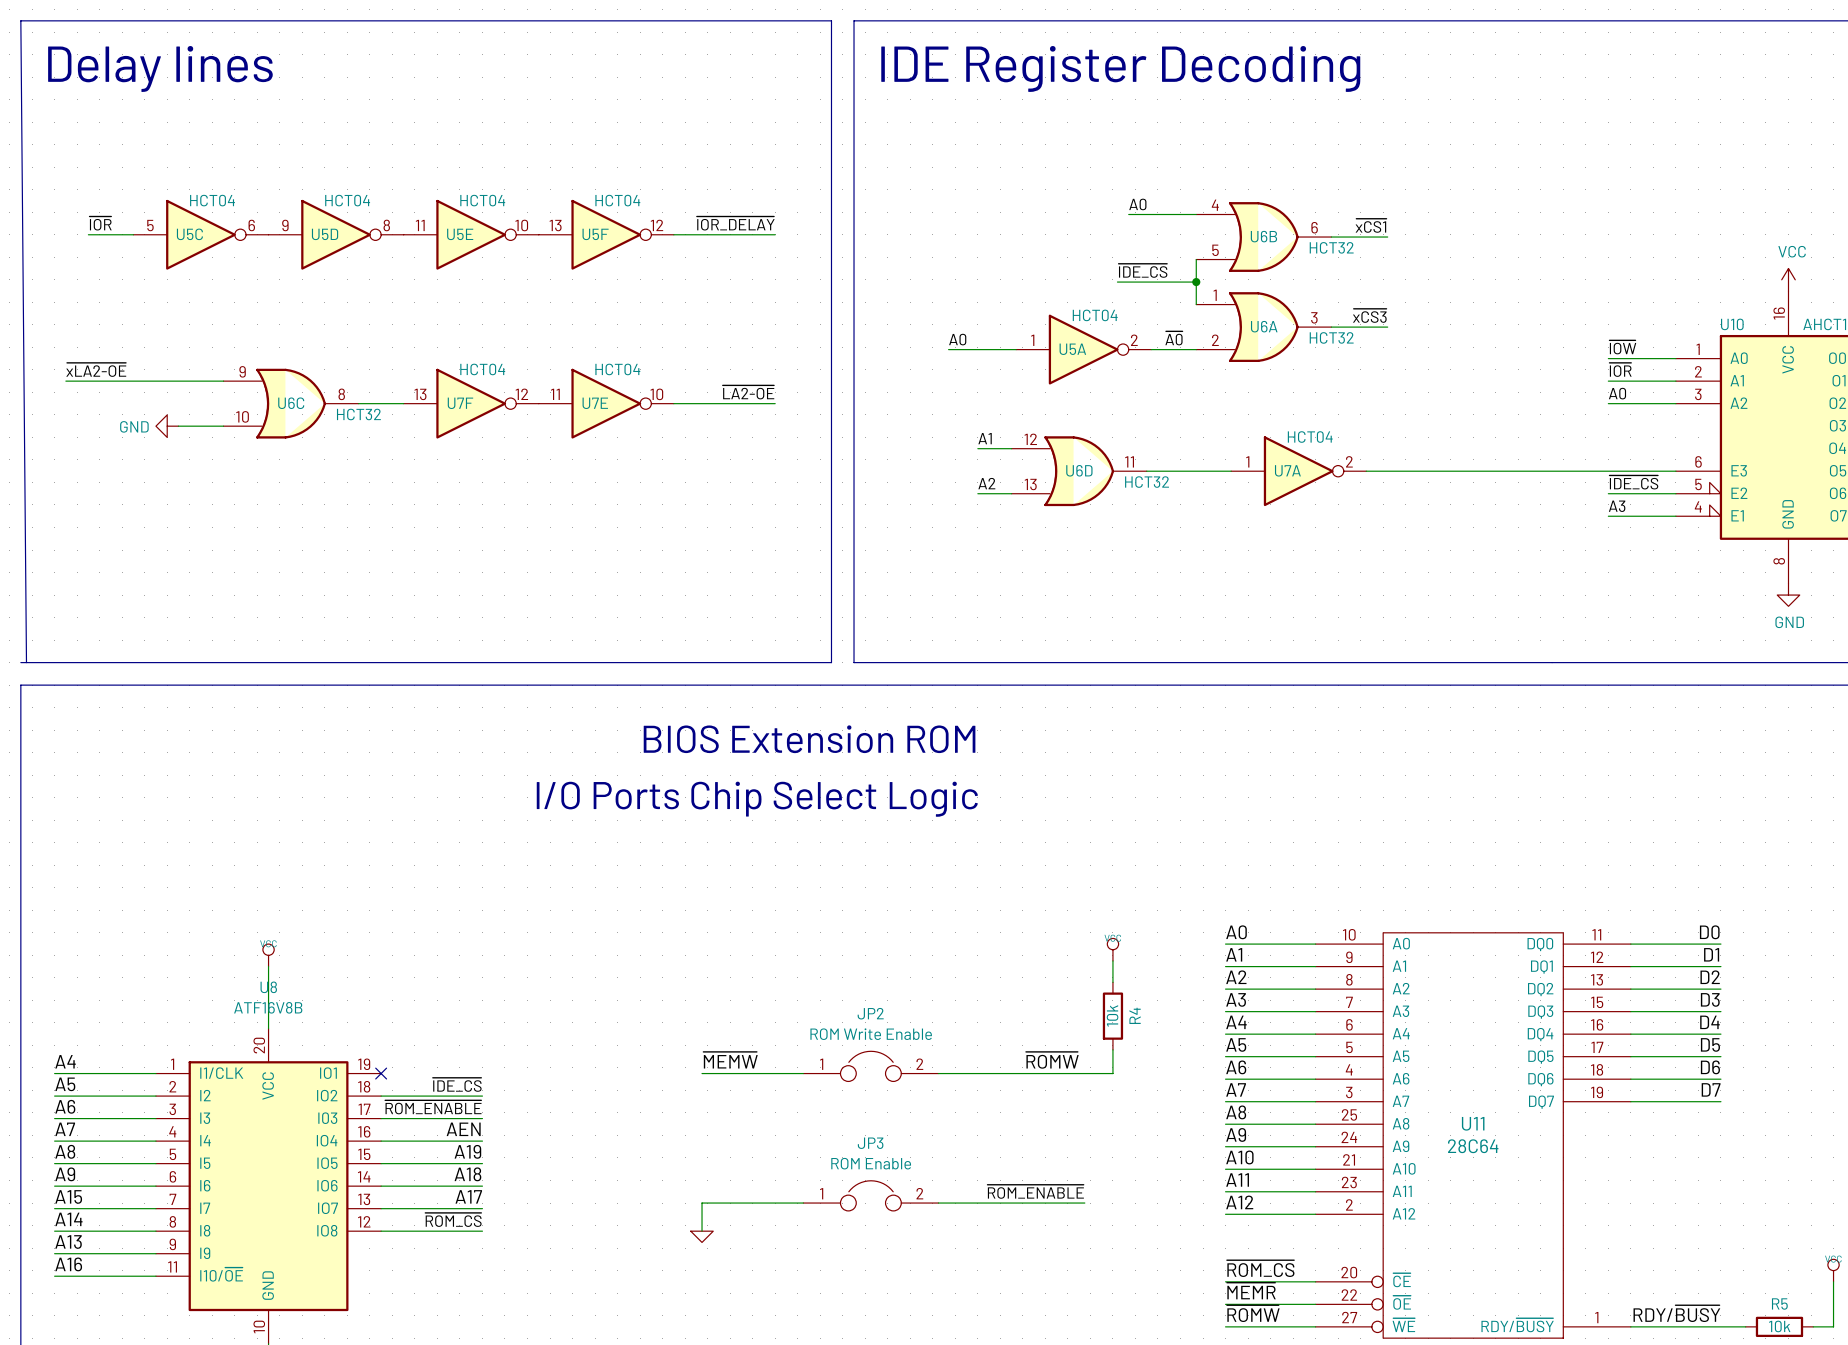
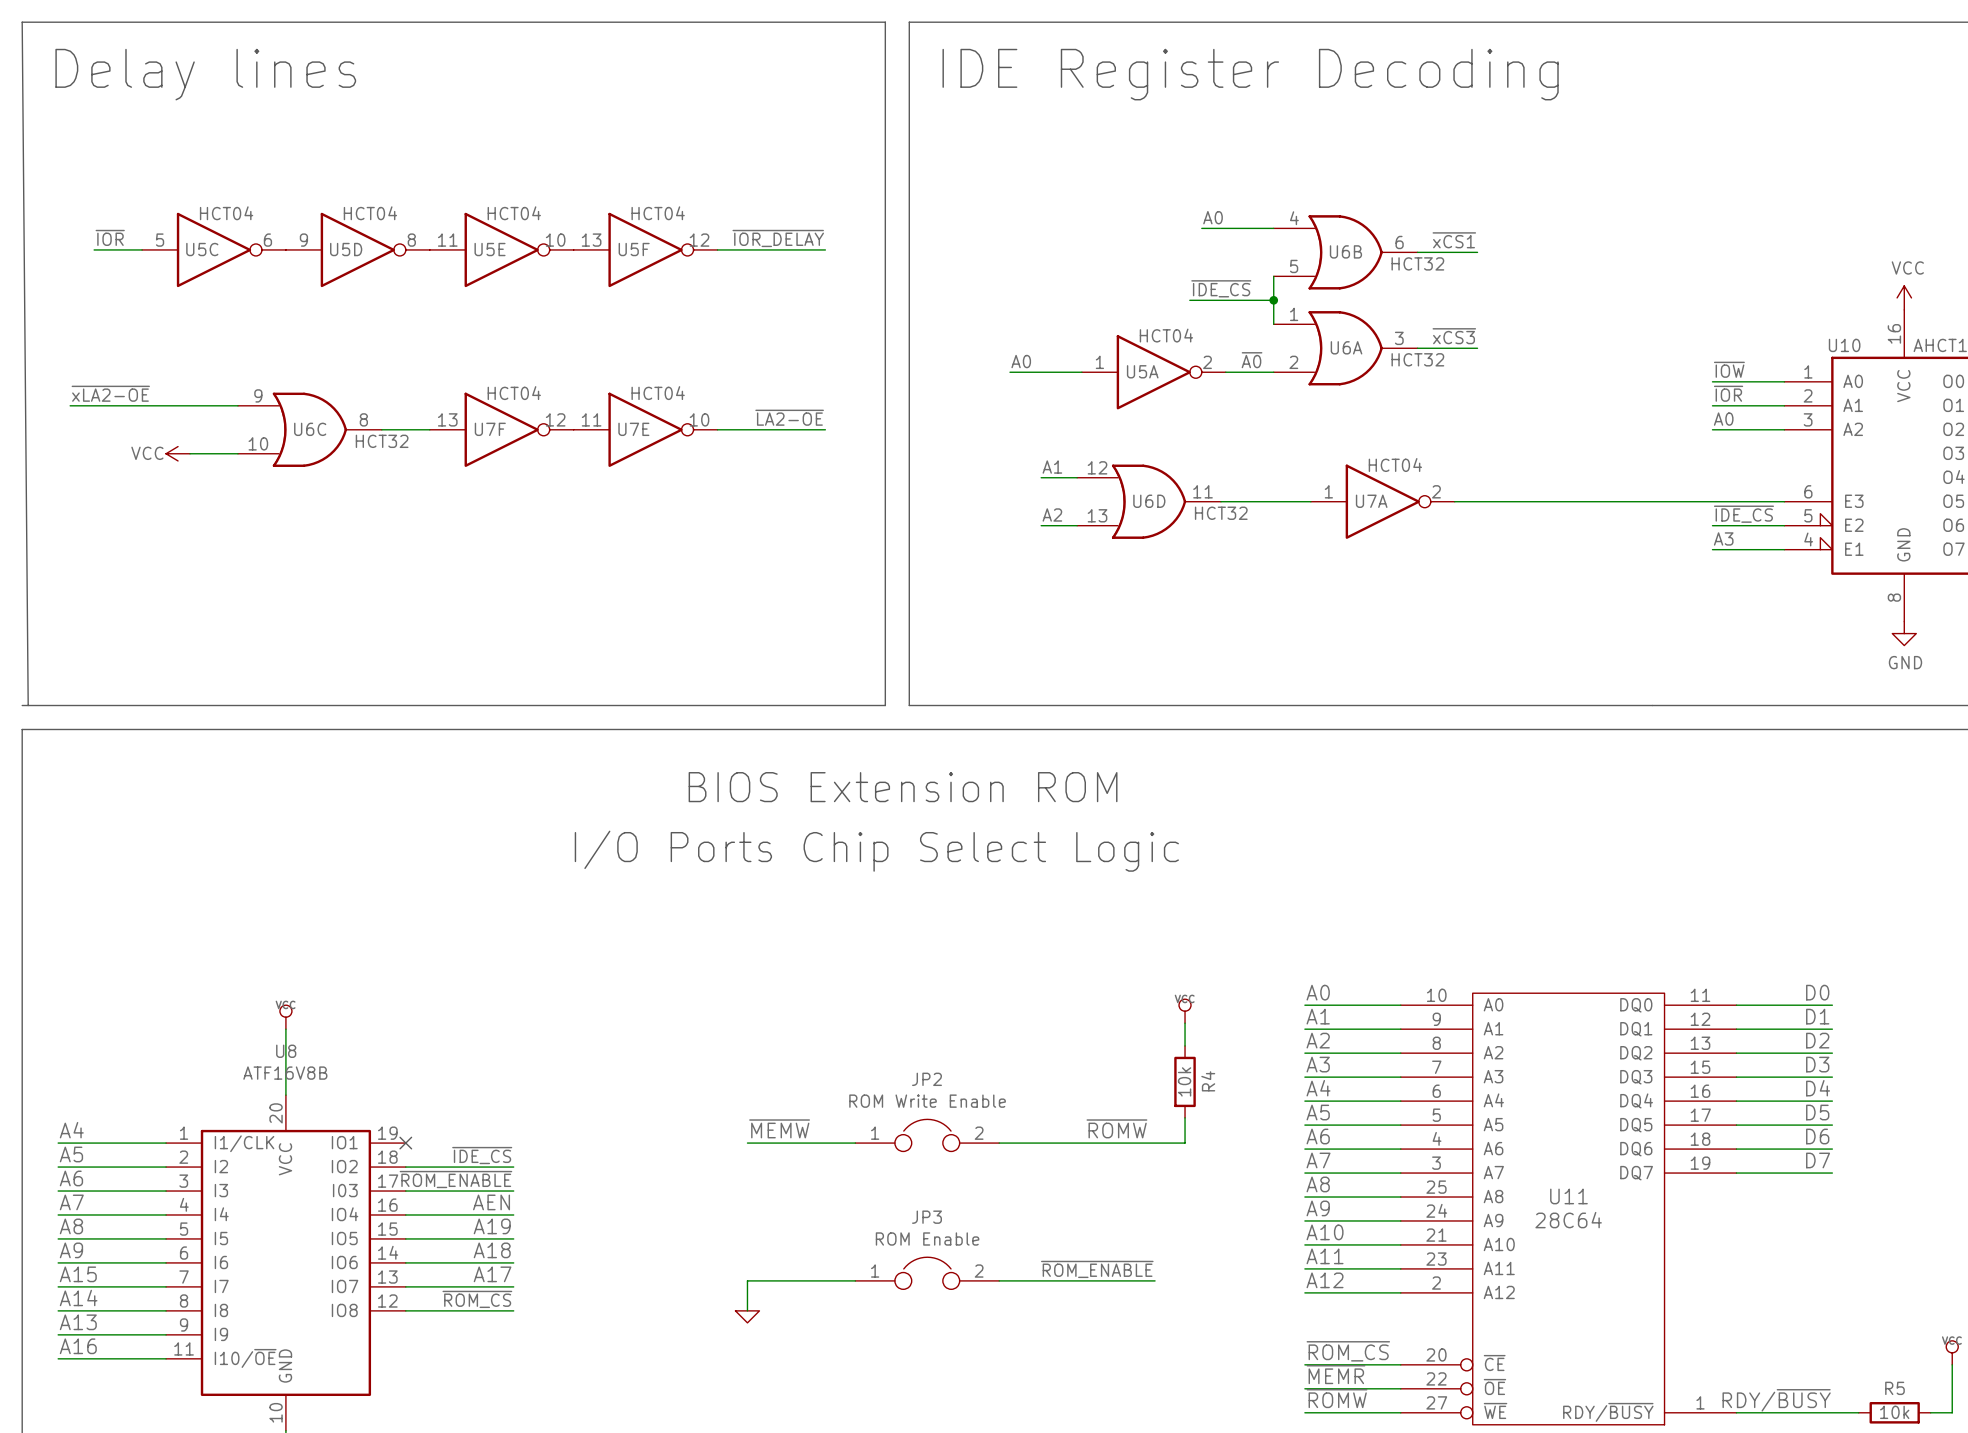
power symbol: GND (167, 426) -> VCC (178, 453)

